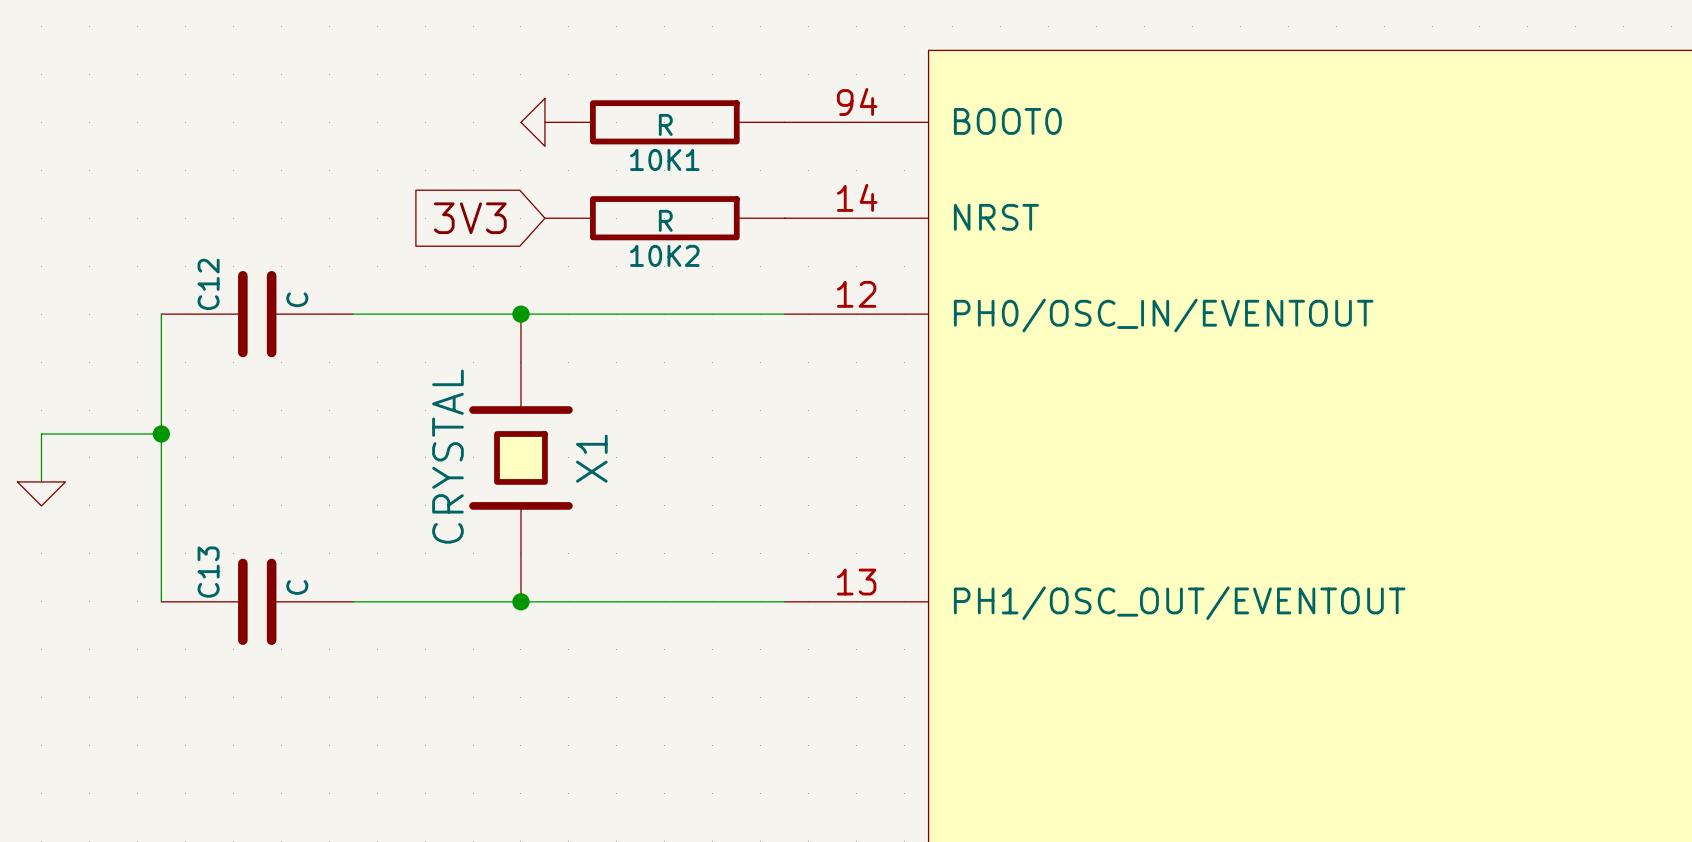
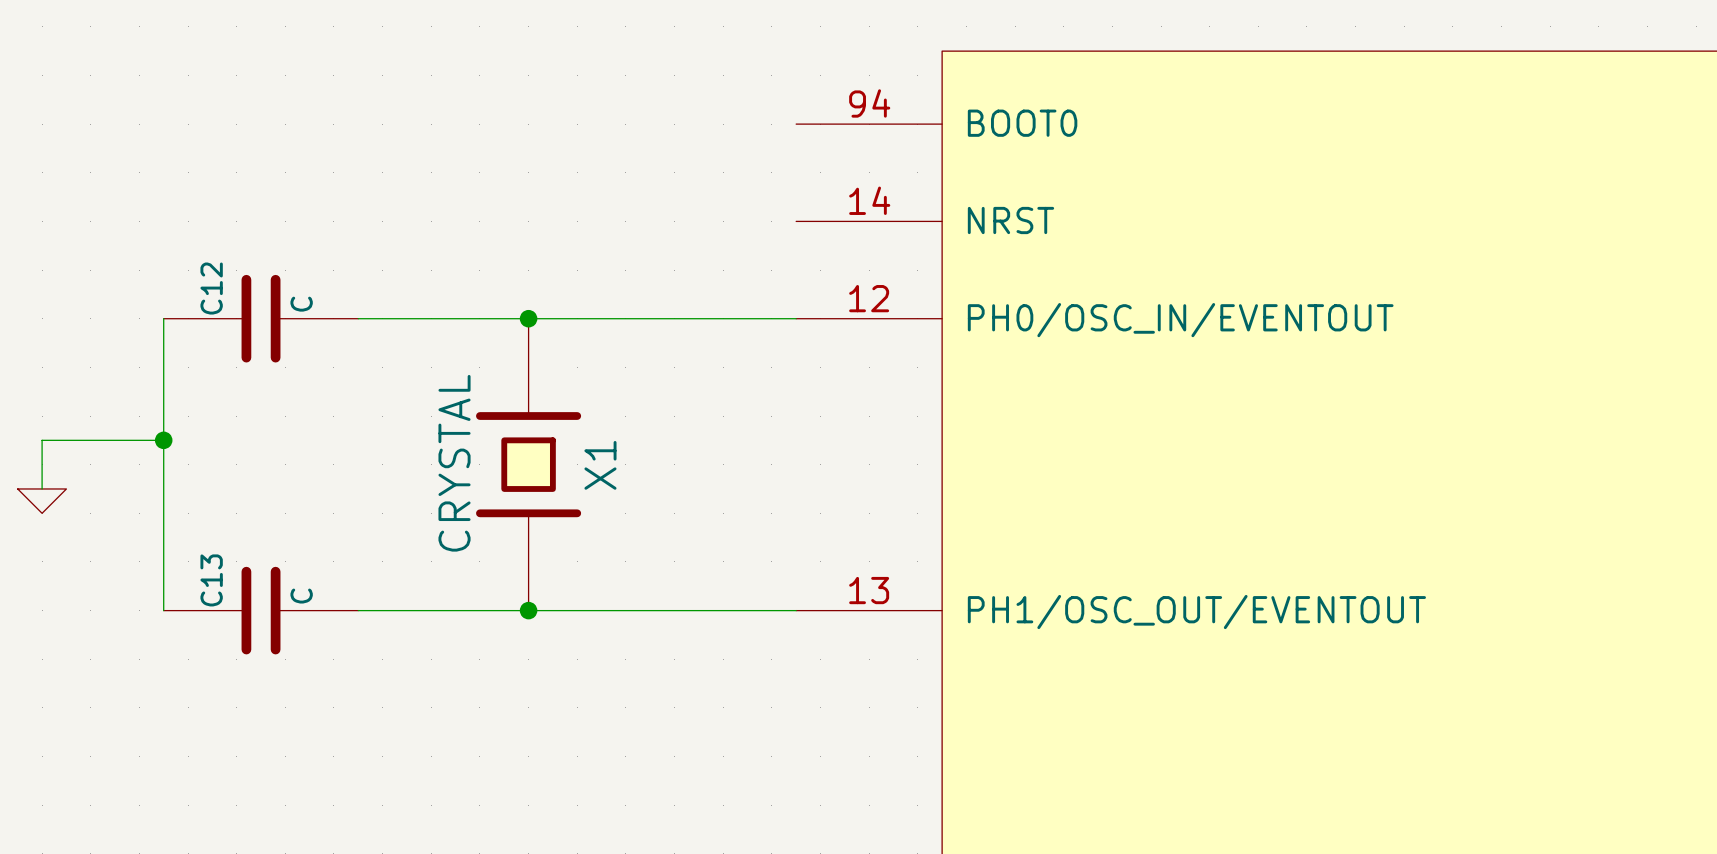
power symbol: (532, 122) -> none
10K1: R (664, 122) -> none
global label: 3V3 (470, 218) -> none
10K2: R (664, 218) -> none

